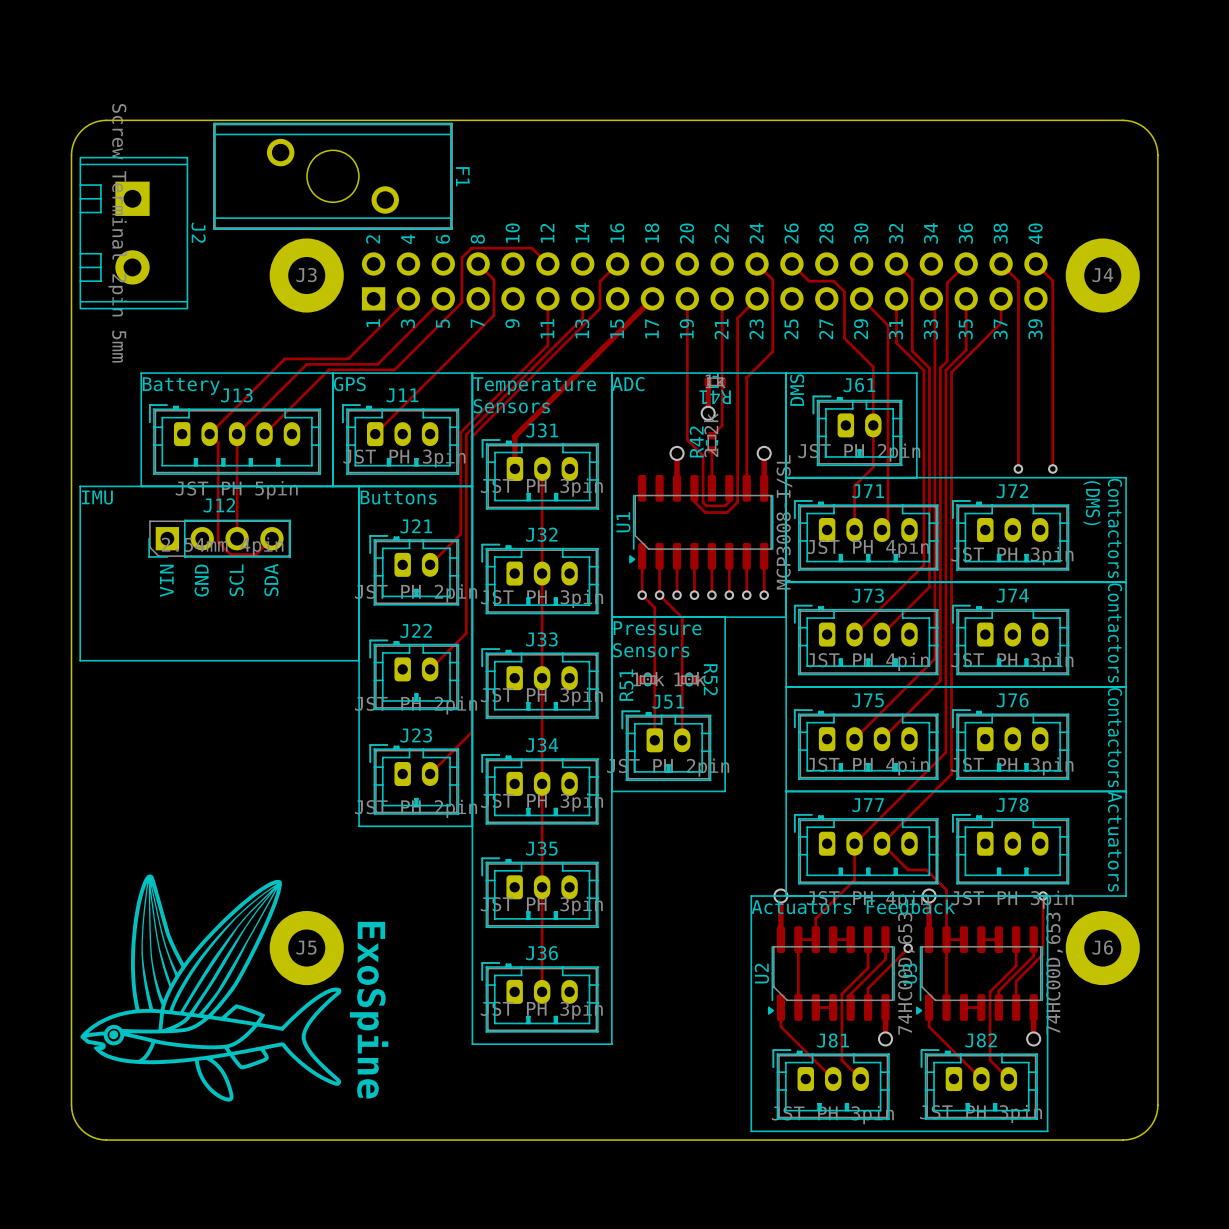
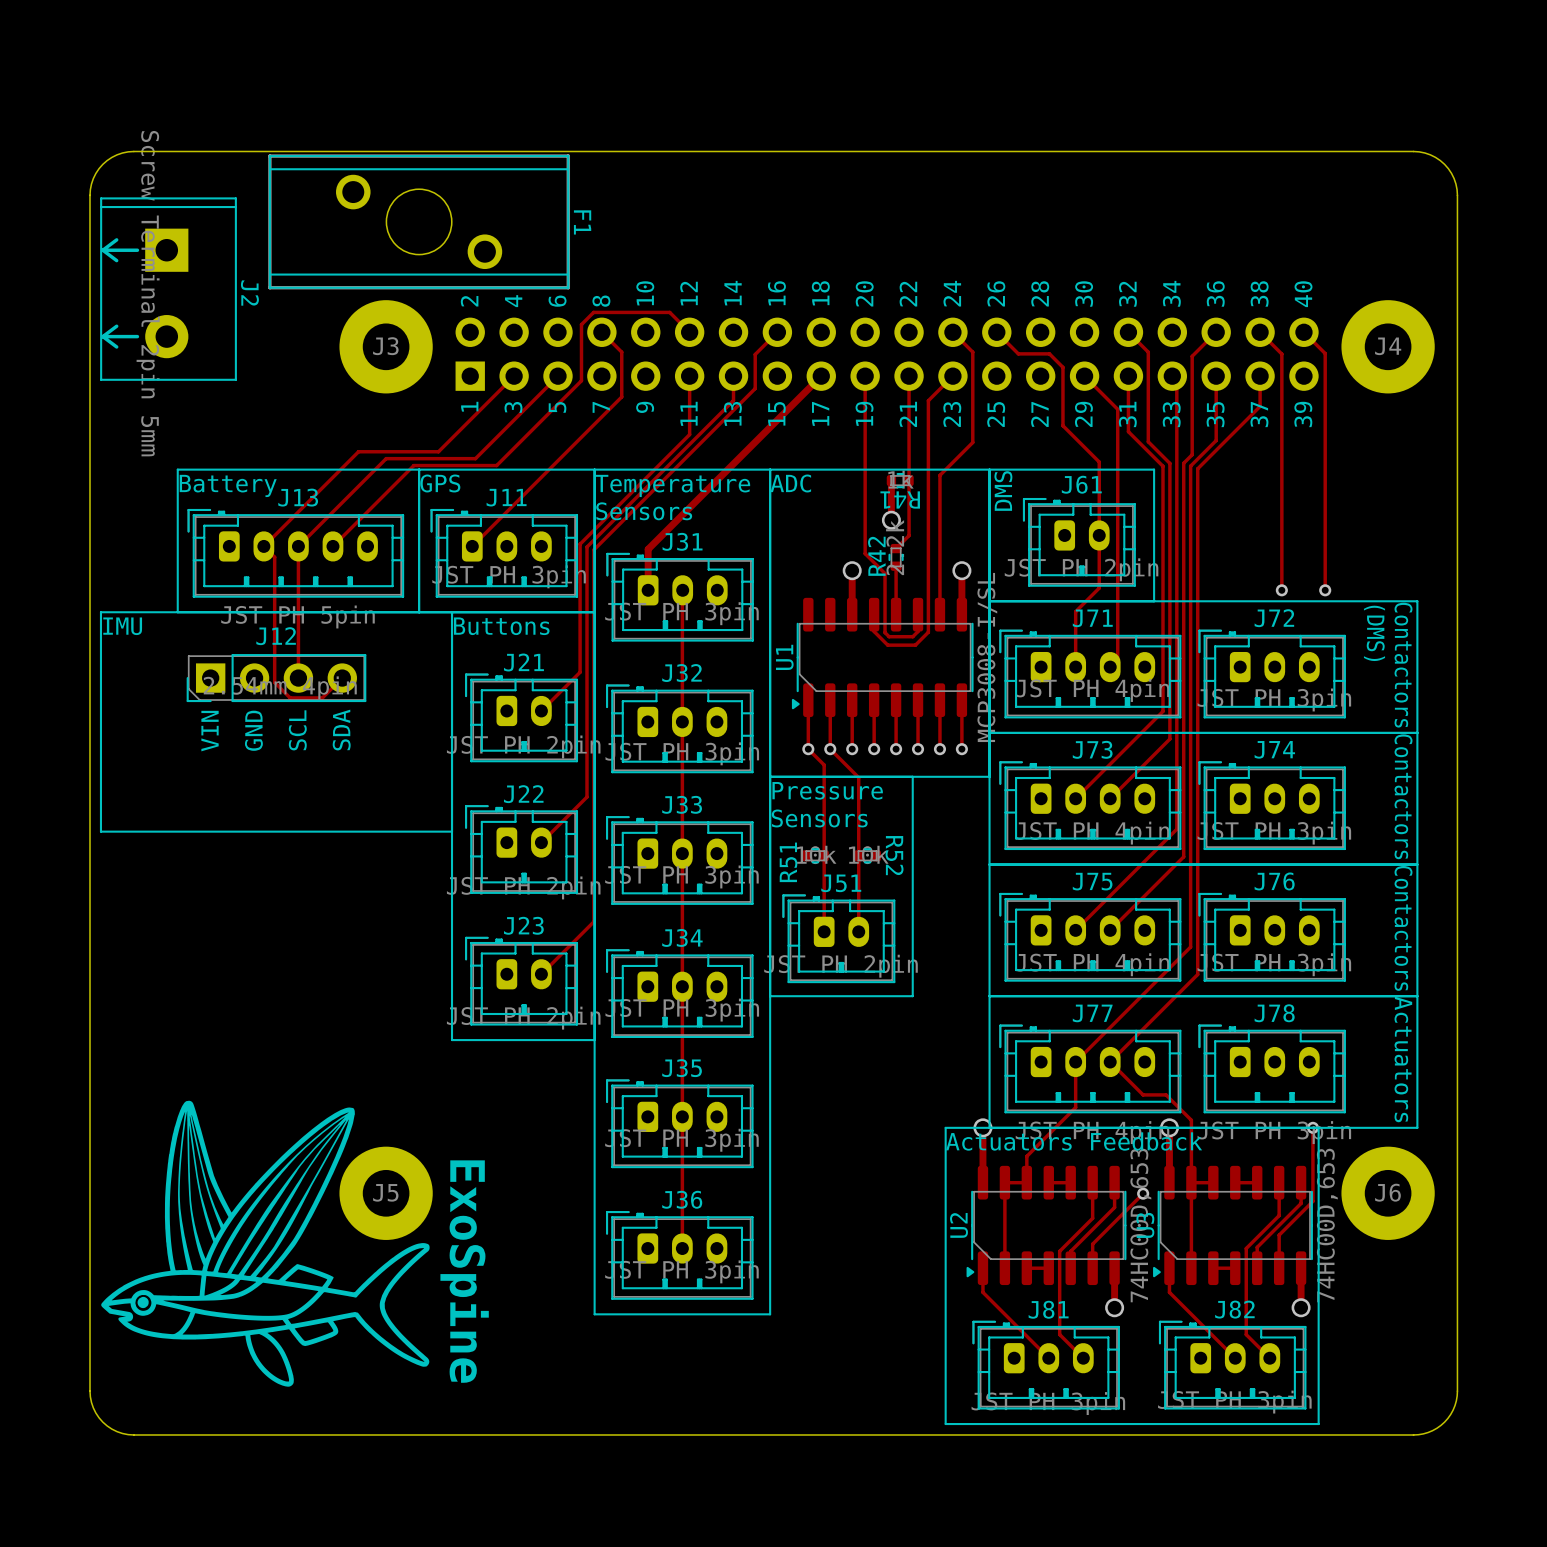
J2 footprint: [79, 156, 189, 310] -> [100, 197, 237, 381]

